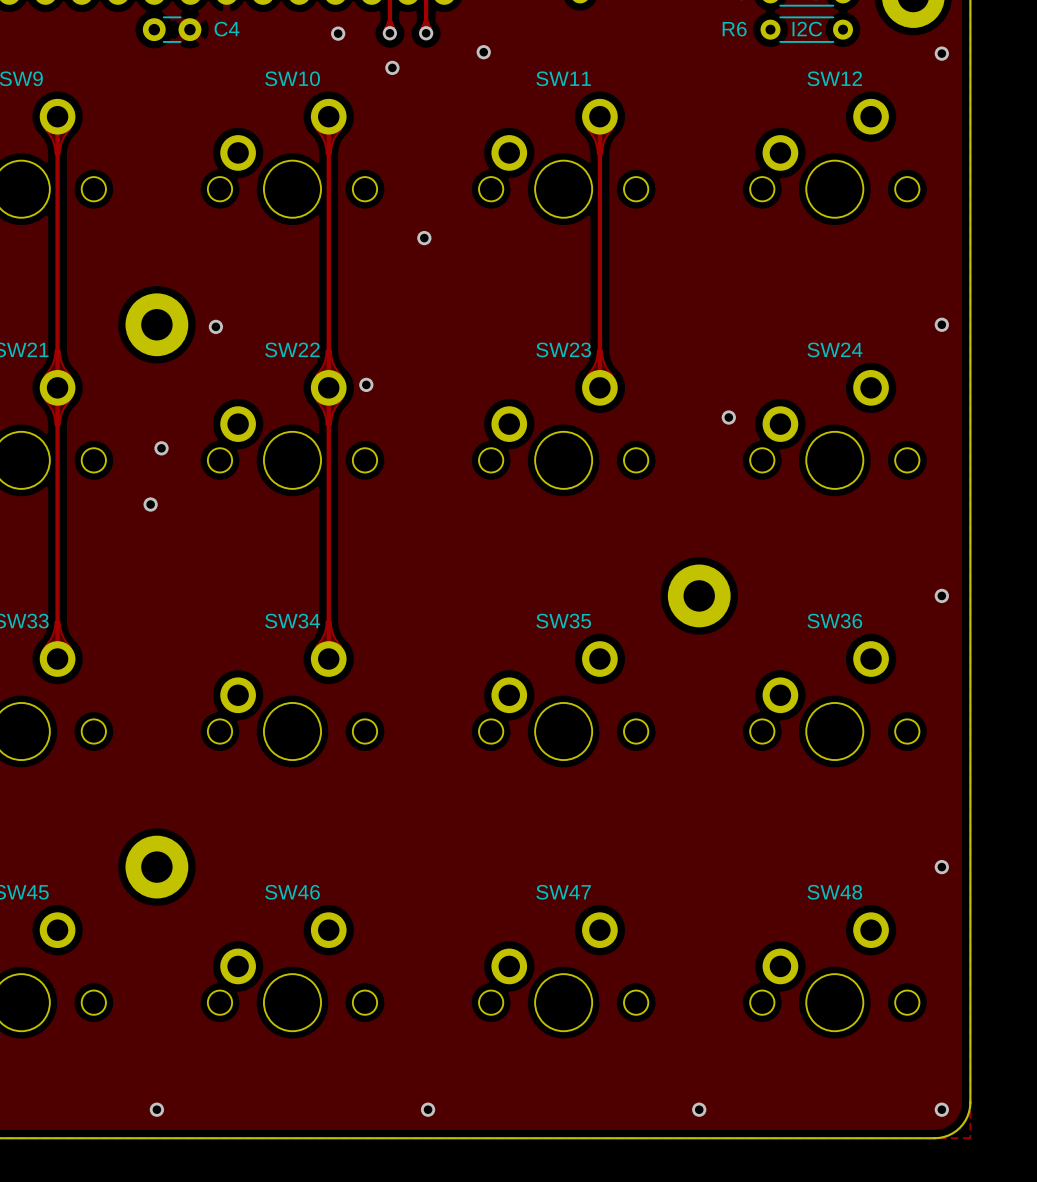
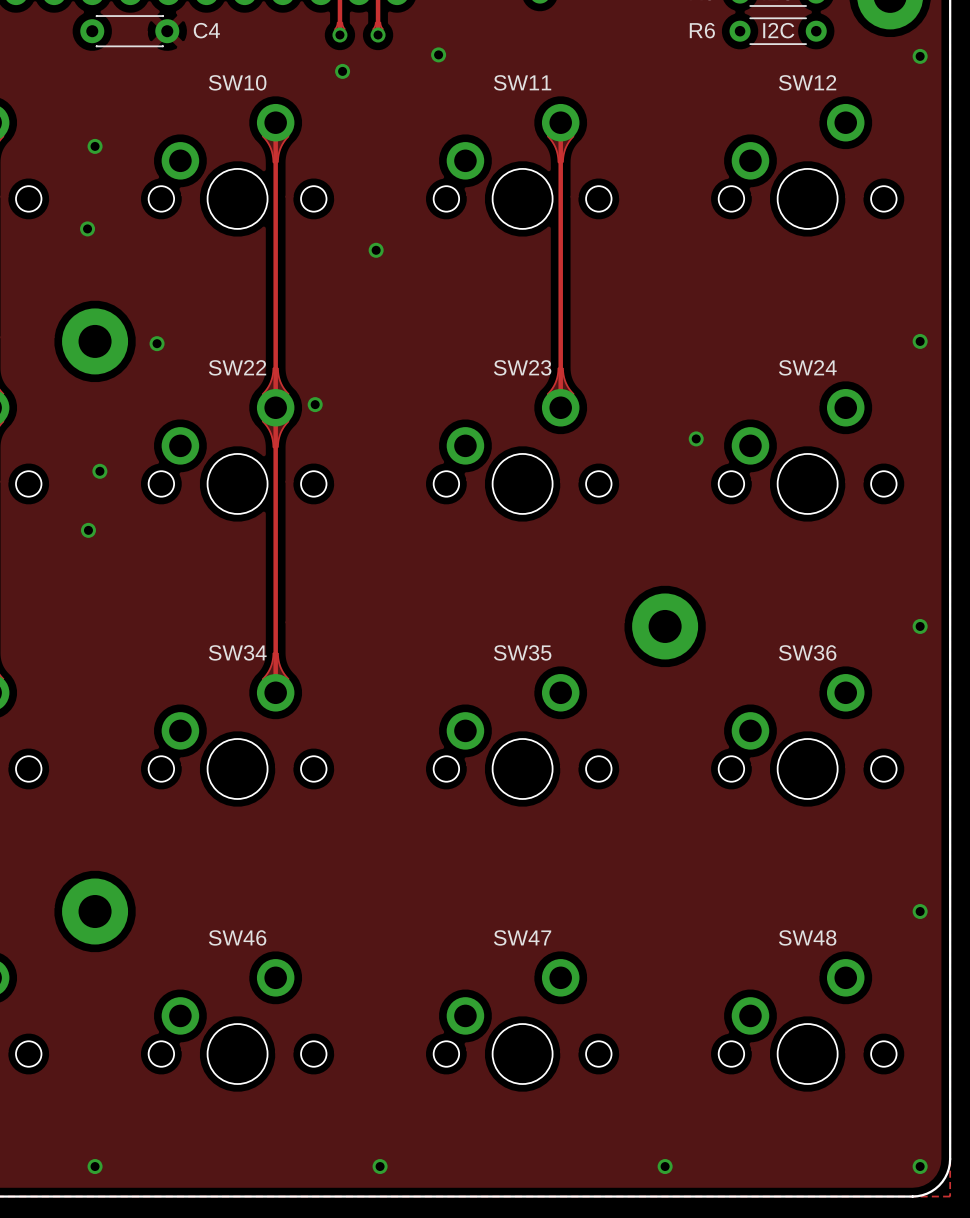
C4 footprint: [142, 16, 202, 43] -> [80, 15, 180, 48]
via: (338, 33) -> none
via: none -> (95, 146)
via: none -> (87, 228)

